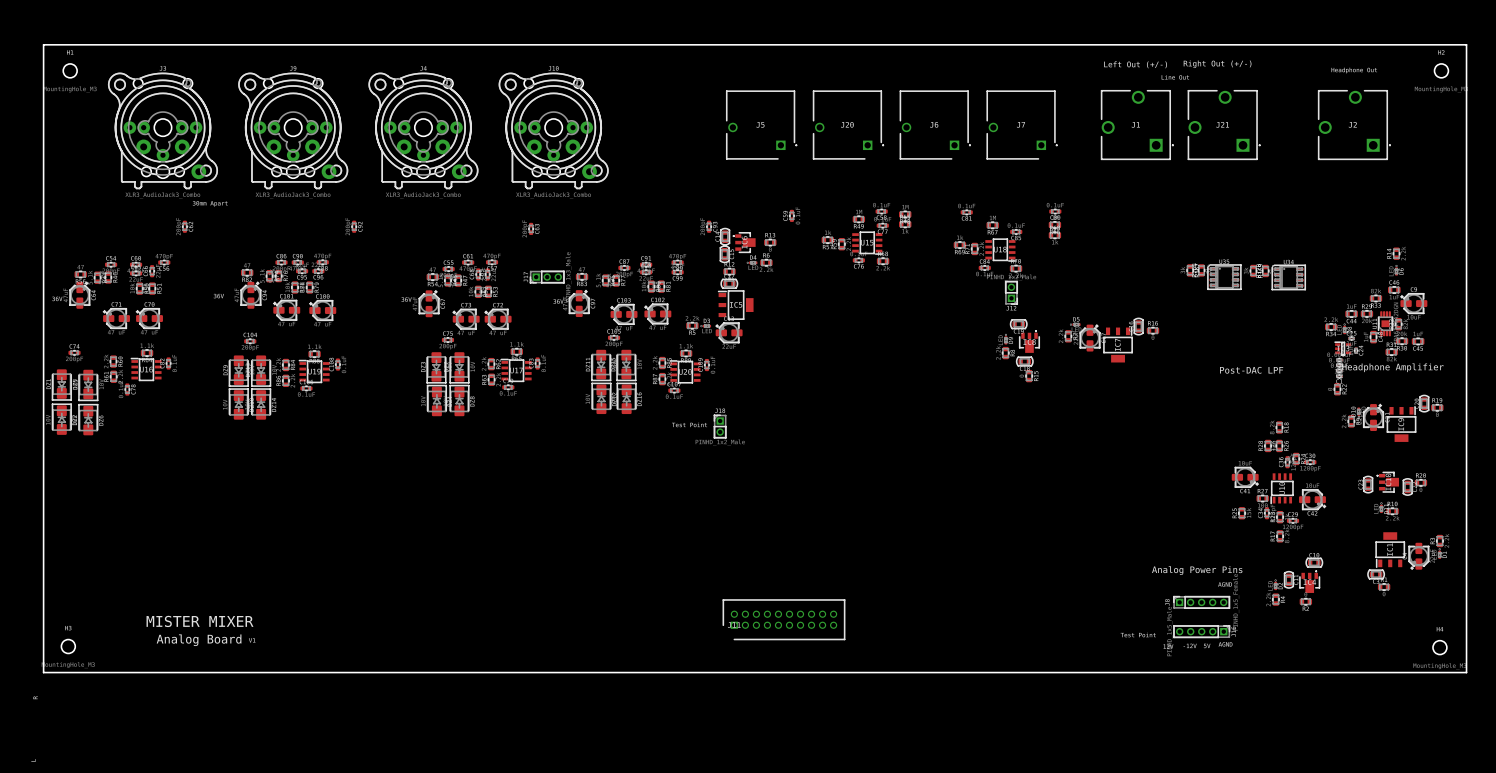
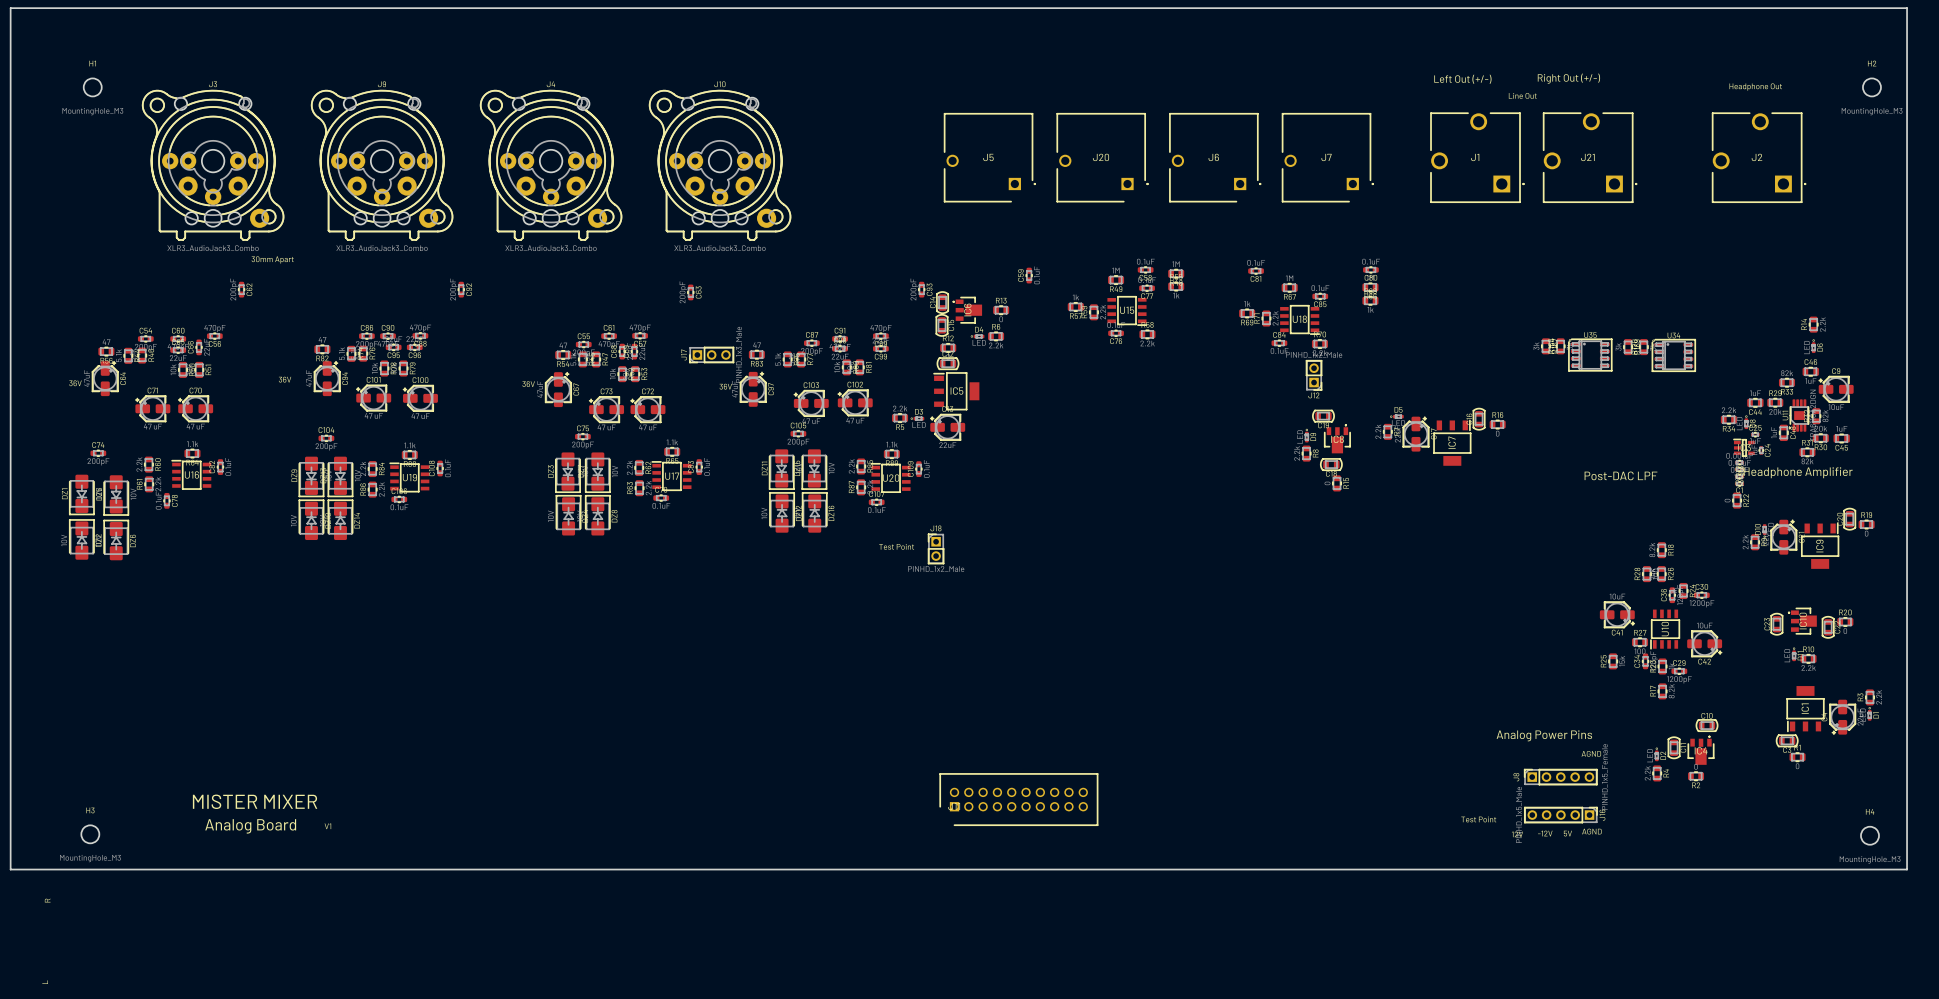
board edge: (43, 44) (1466, 44) (1466, 672) (43, 672) (43, 44) -> (10, 8) (10, 869) (1907, 869) (1907, 8) (10, 8)

